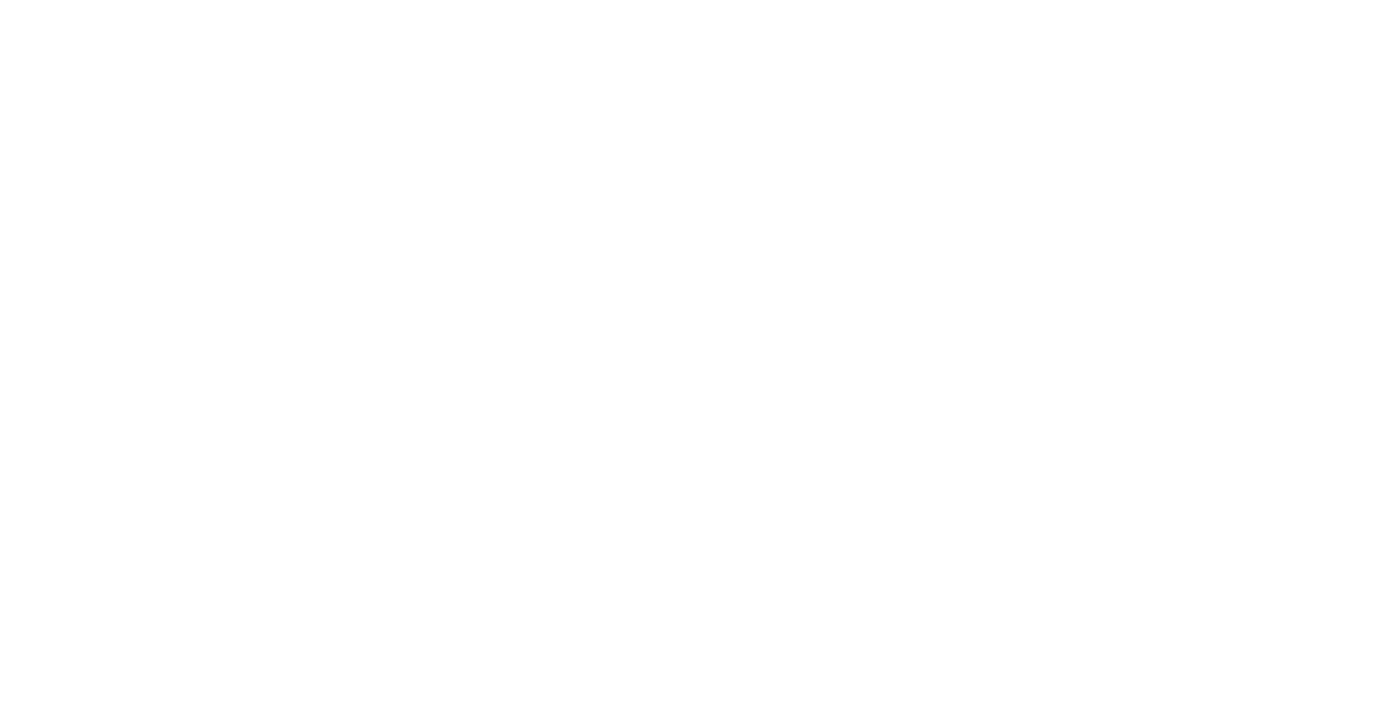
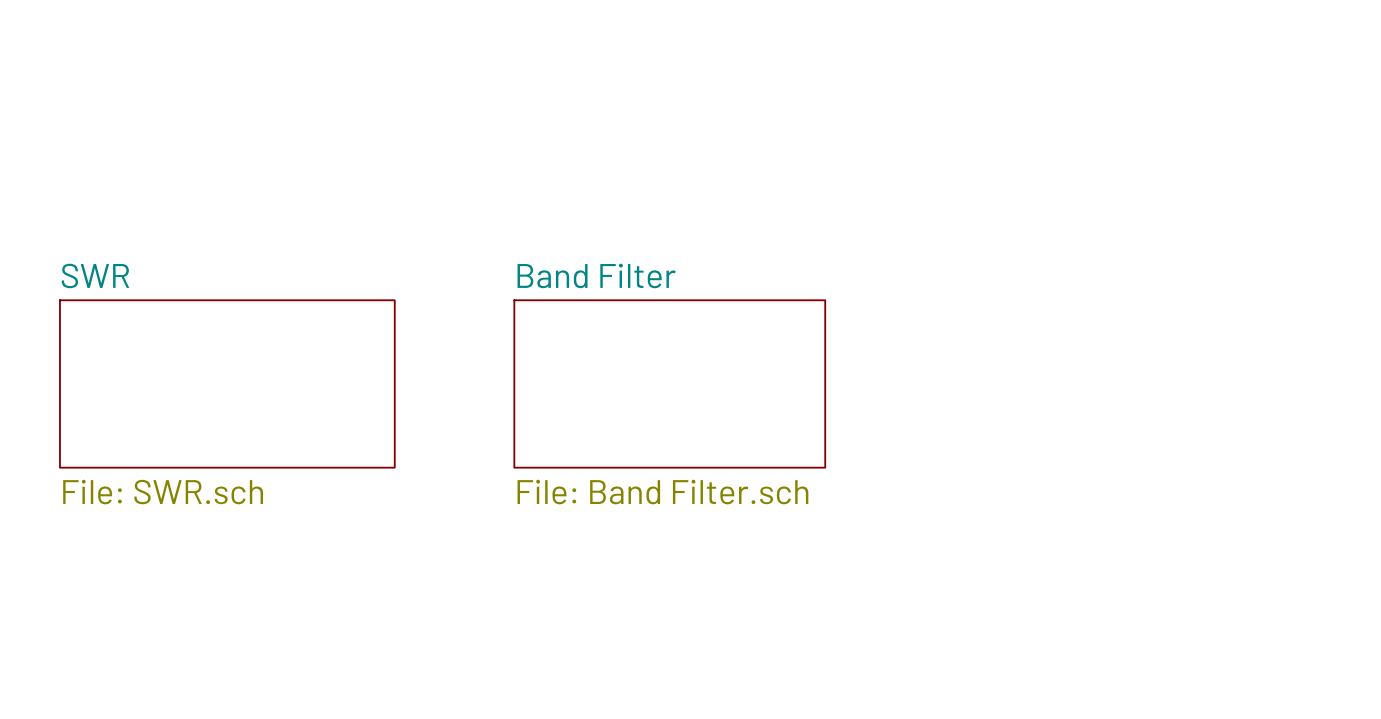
sheet SWR: none -> File: SWR.sch (227, 383)
sheet Band Filter: none -> File: Band Filter.sch (669, 383)

